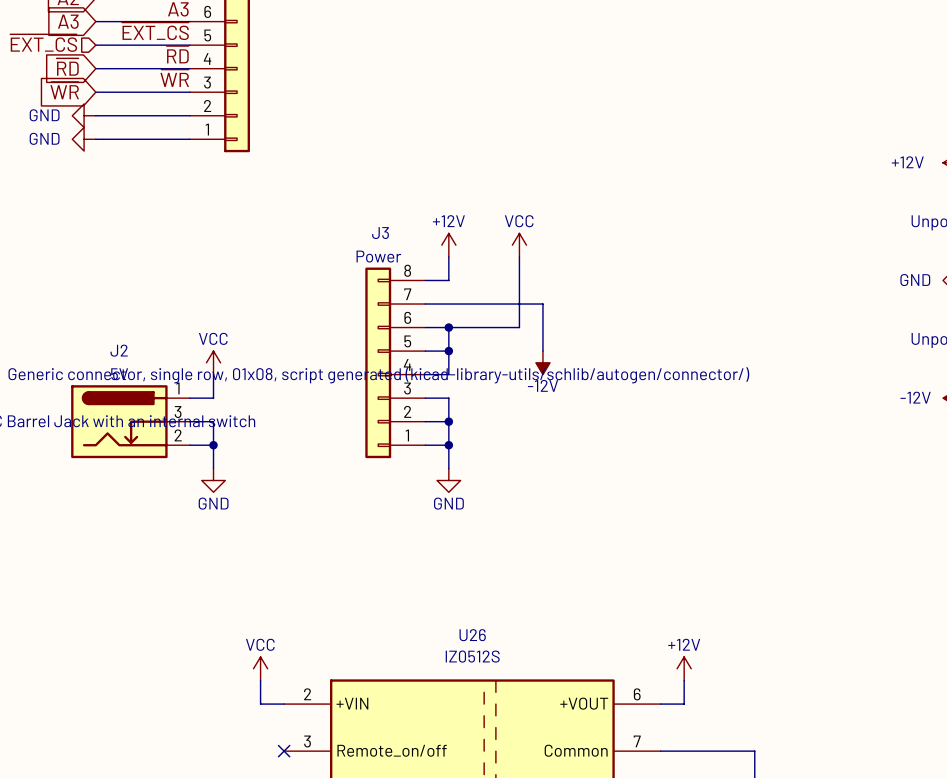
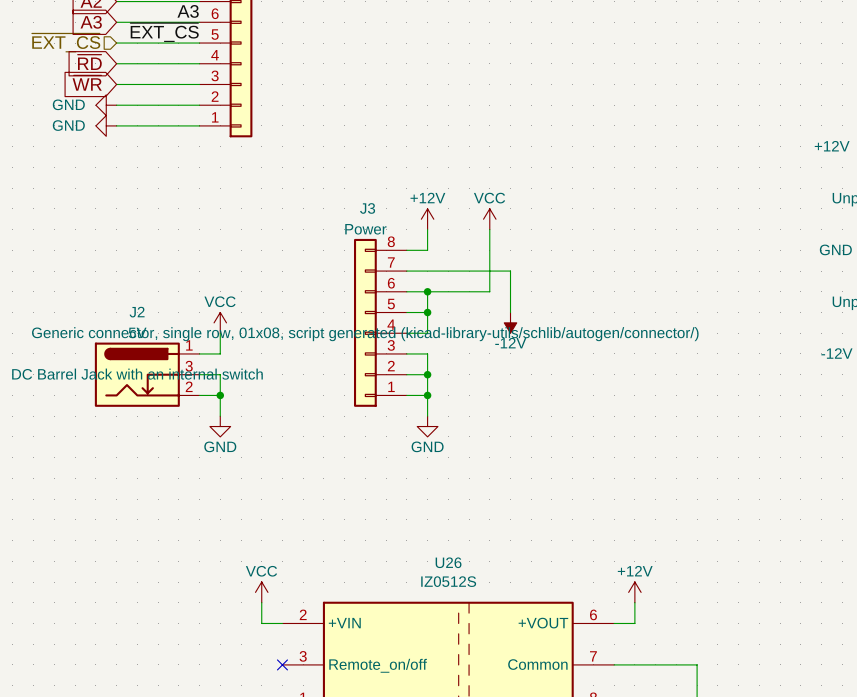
label: ~{RD} (177, 54) -> none
label: ~{WR} (174, 78) -> none

